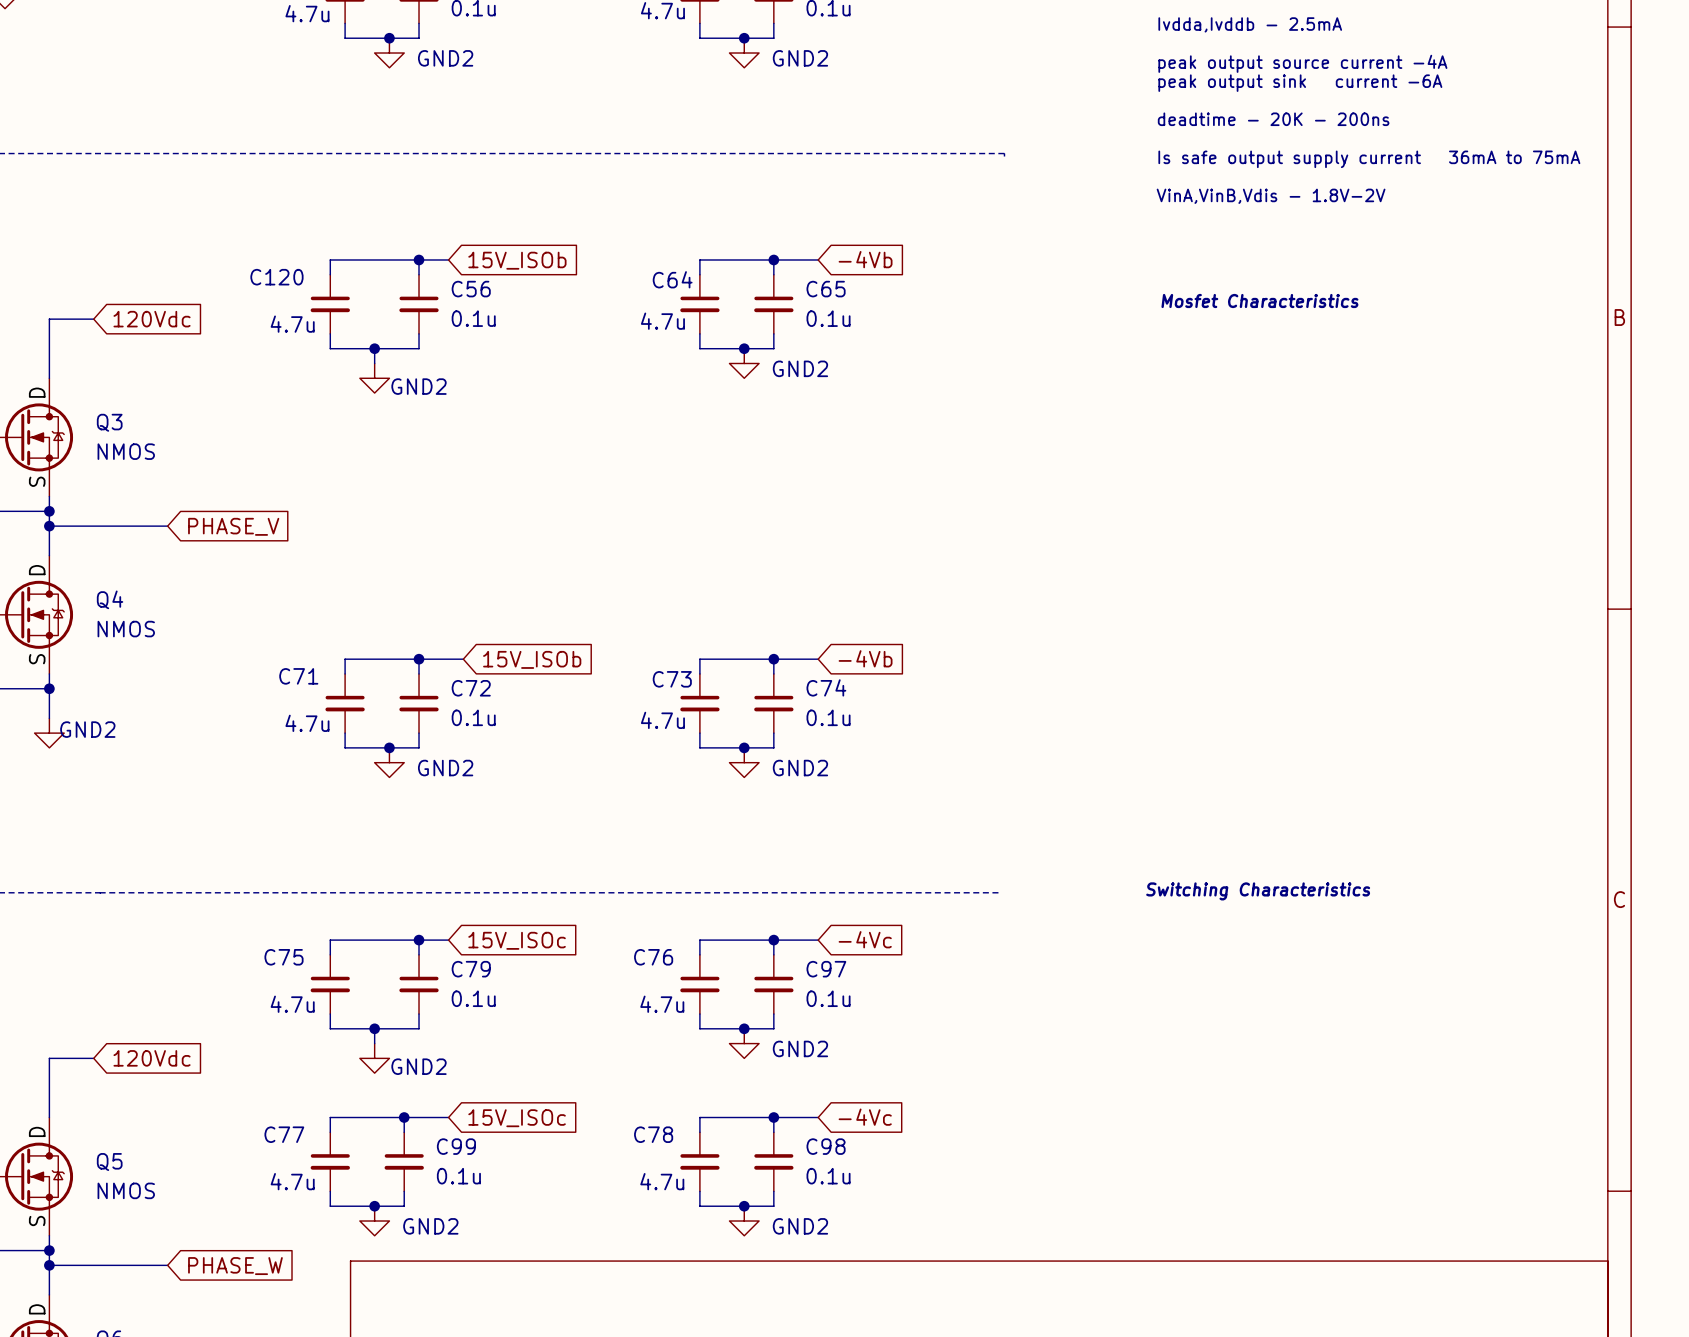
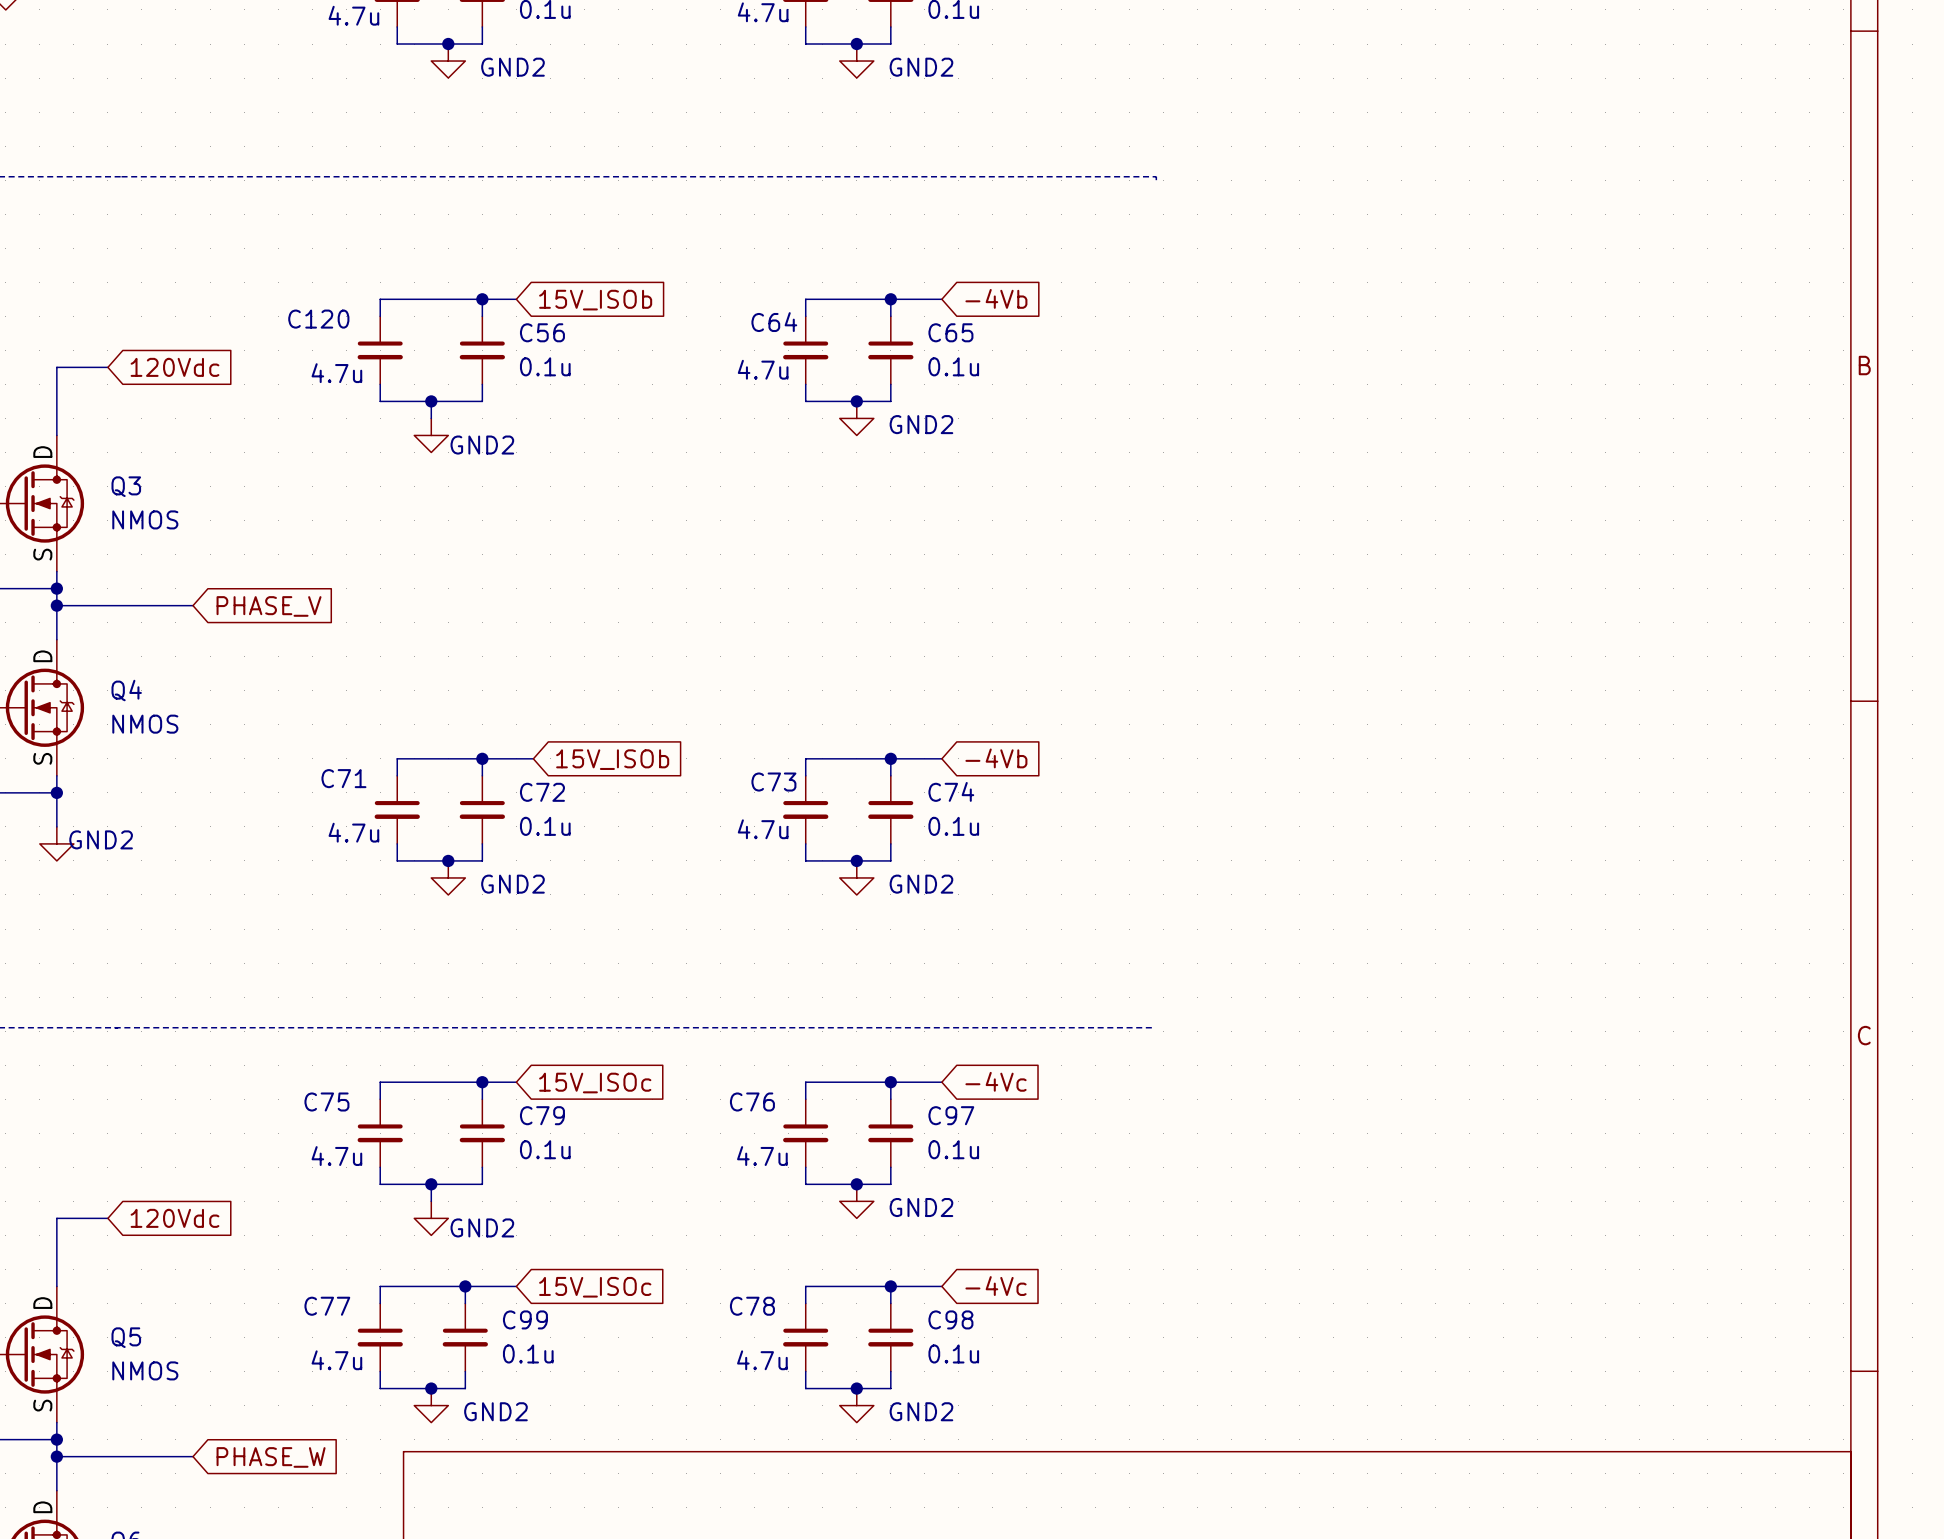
text: Ivdda,Ivddb - 2.5mA (1250, 24) -> none
text: peak output source current -4A (1302, 63) -> none
text: peak output sink current -6A (1300, 83) -> none
text: deadtime - 20K - 200ns (1273, 119) -> none
text: Is safe output supply current 36mA to 75mA (1369, 159) -> none
text: VinA,VinB,Vdis - 1.8V-2V (1271, 196) -> none
text: Mosfet Characteristics (1259, 300) -> none
text: Switching Characteristics (1258, 891) -> none

